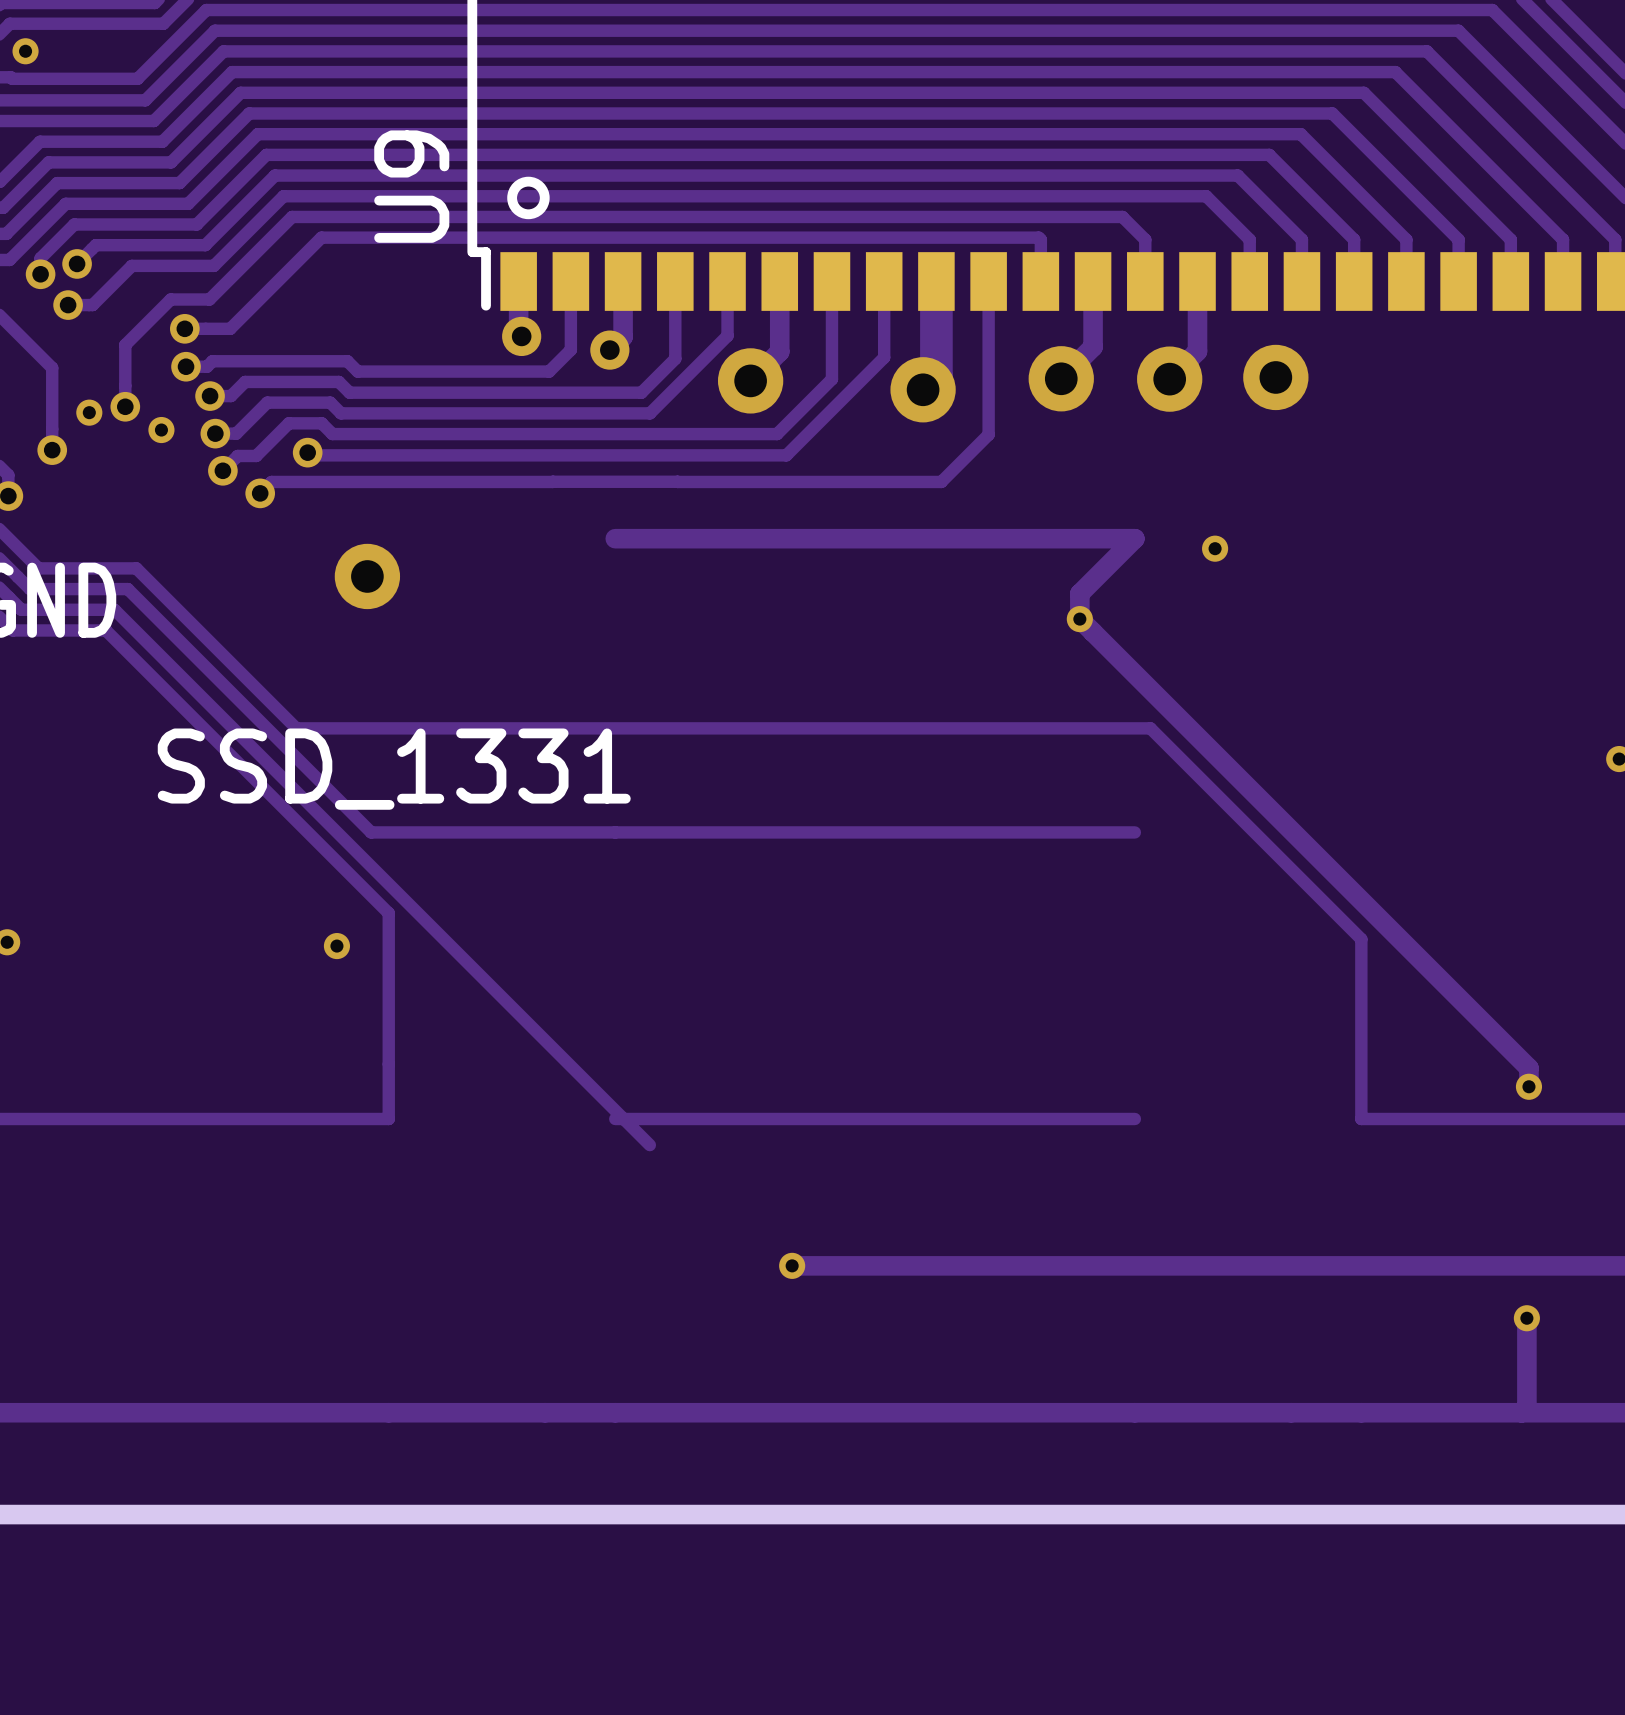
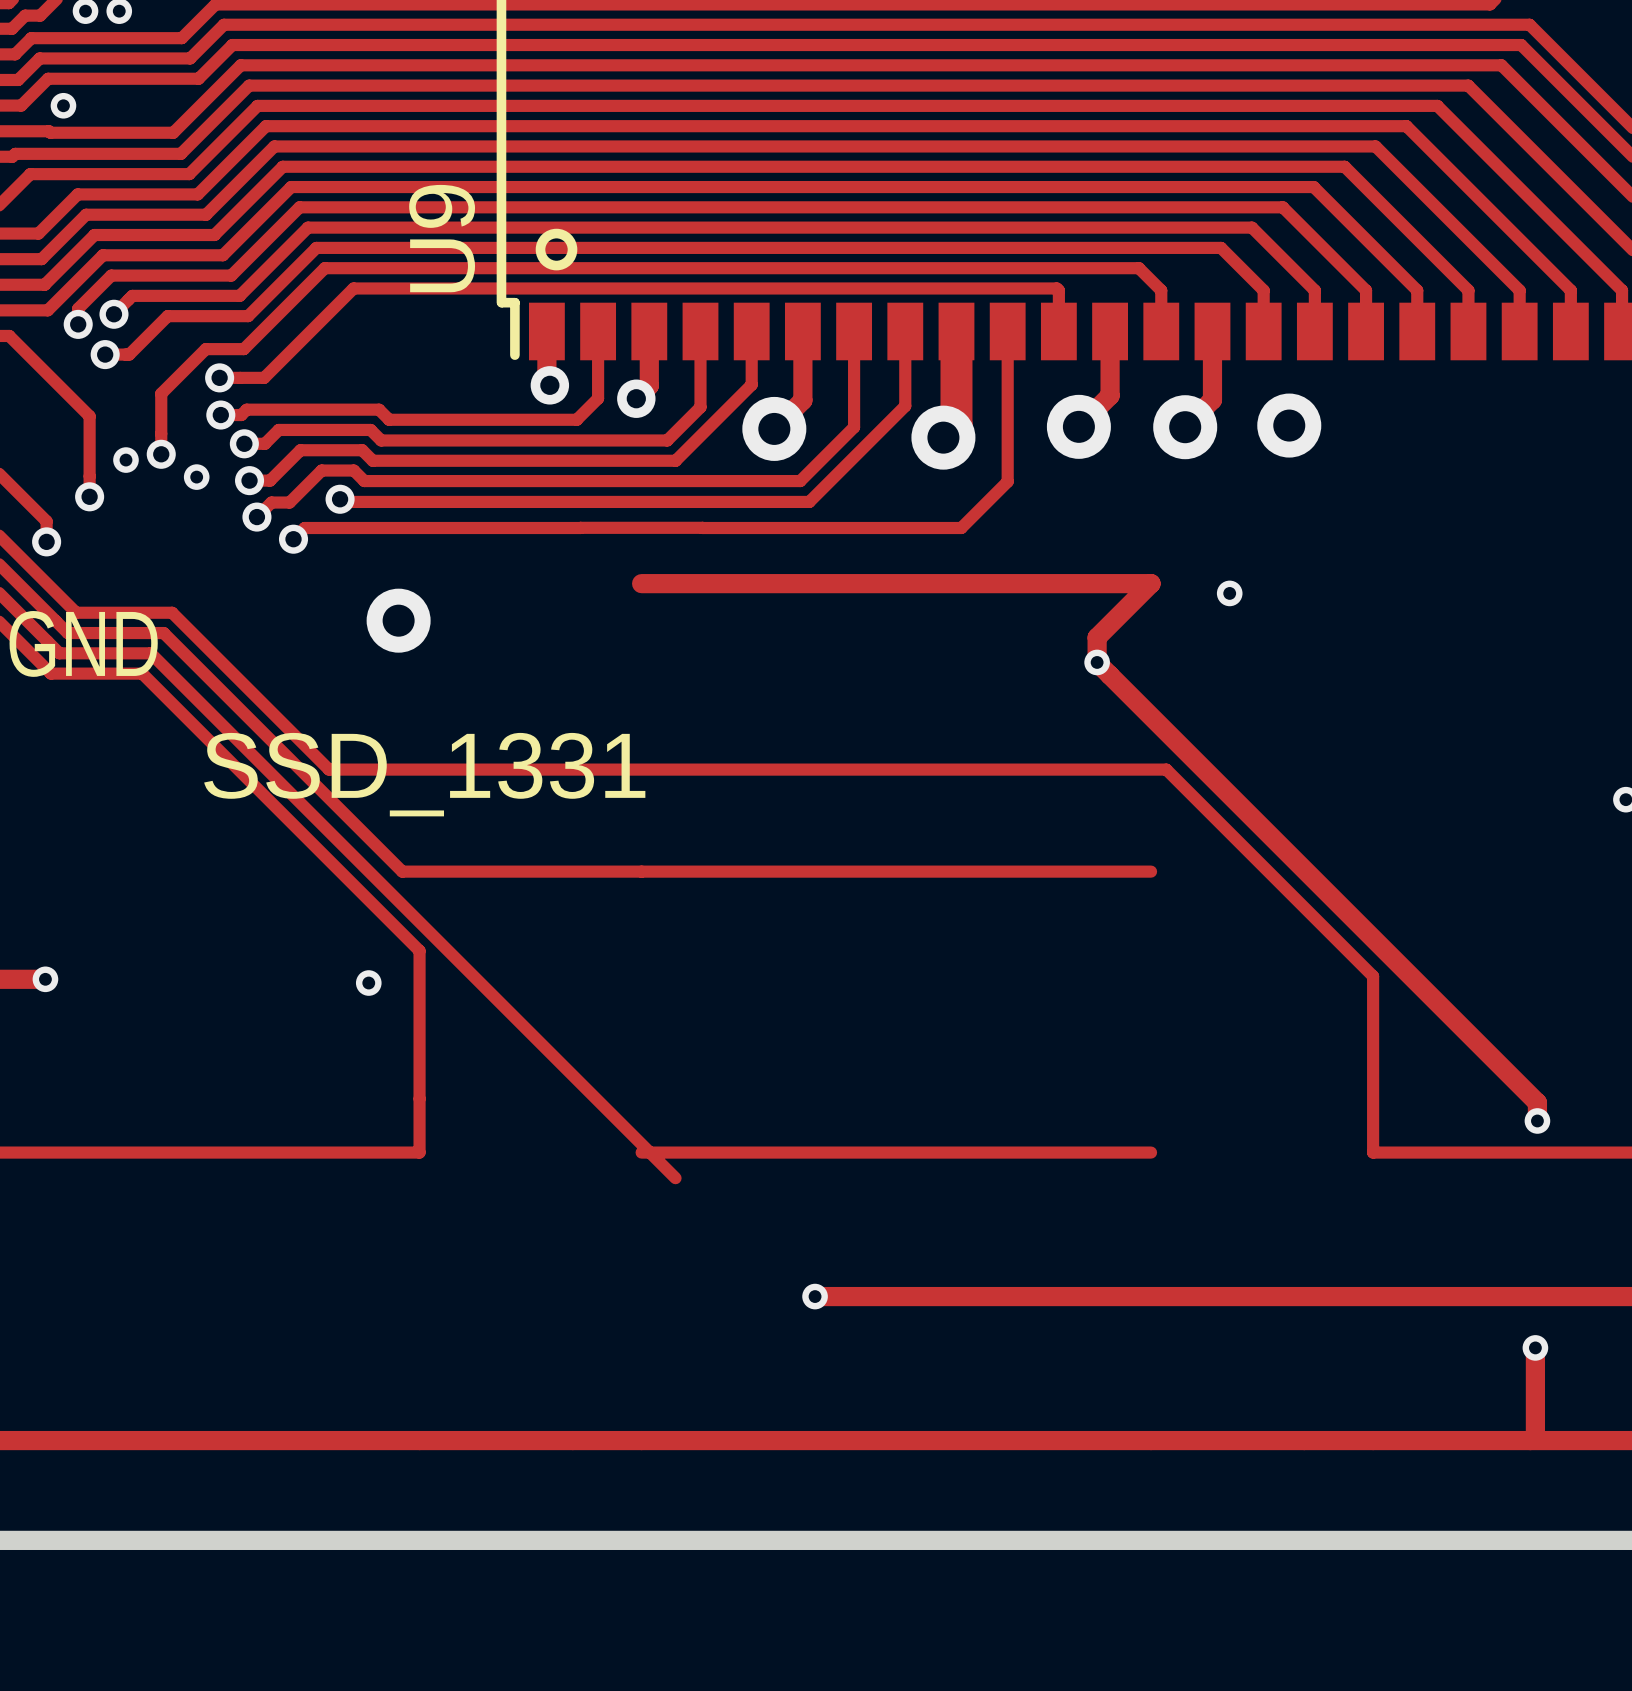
part value position: SSD_1331 (394, 769) -> SSD_1331 (424, 774)

